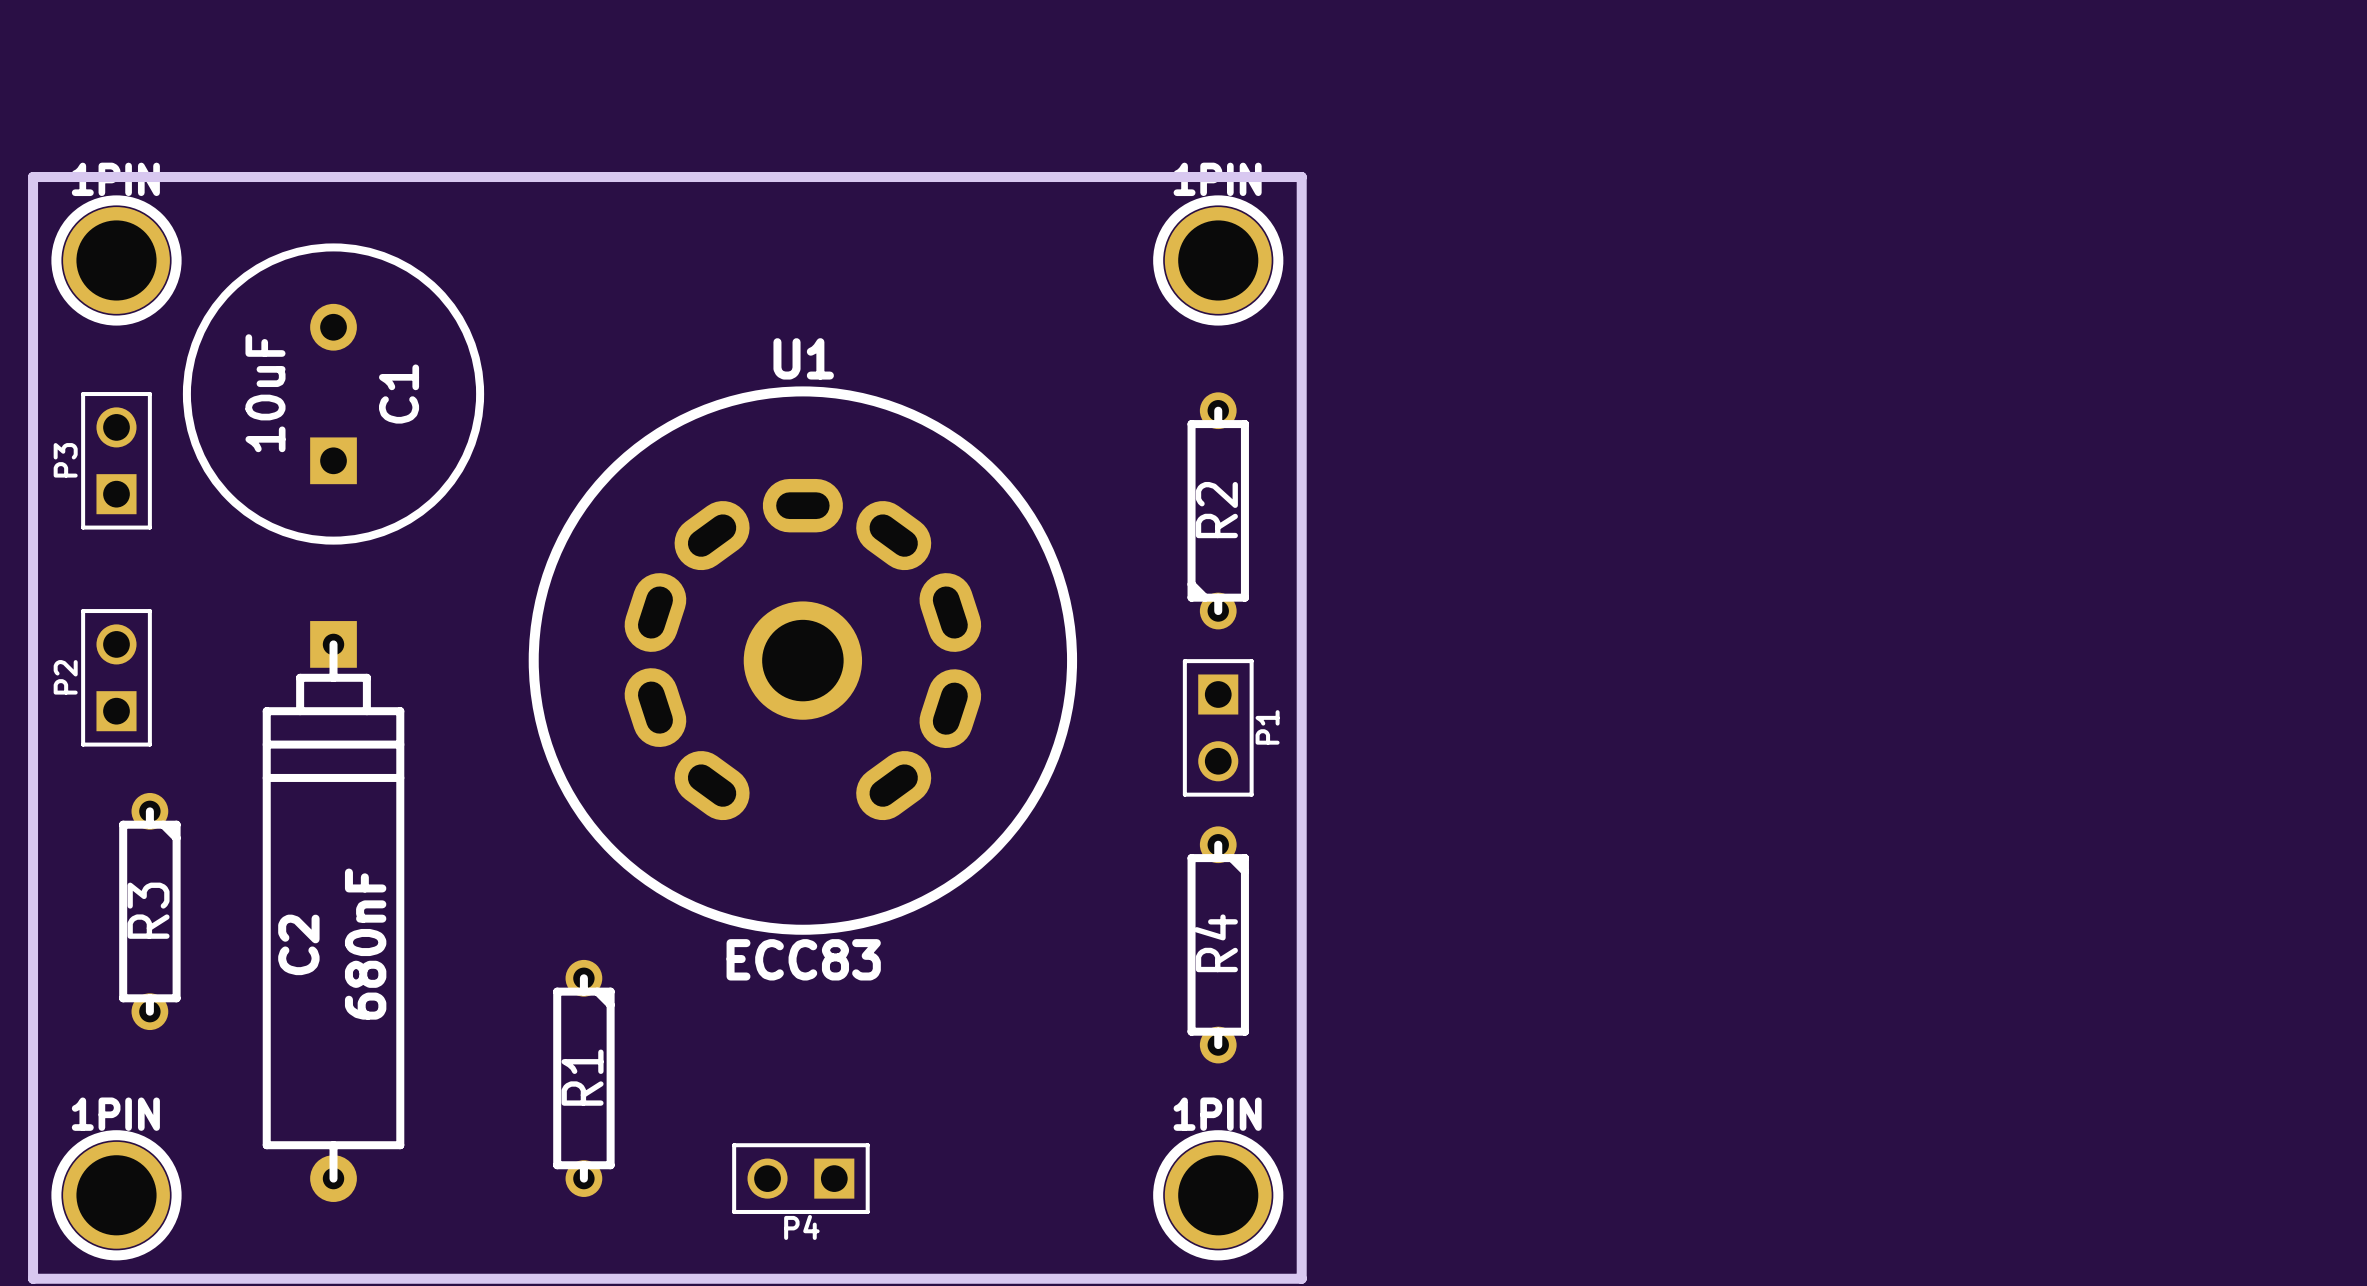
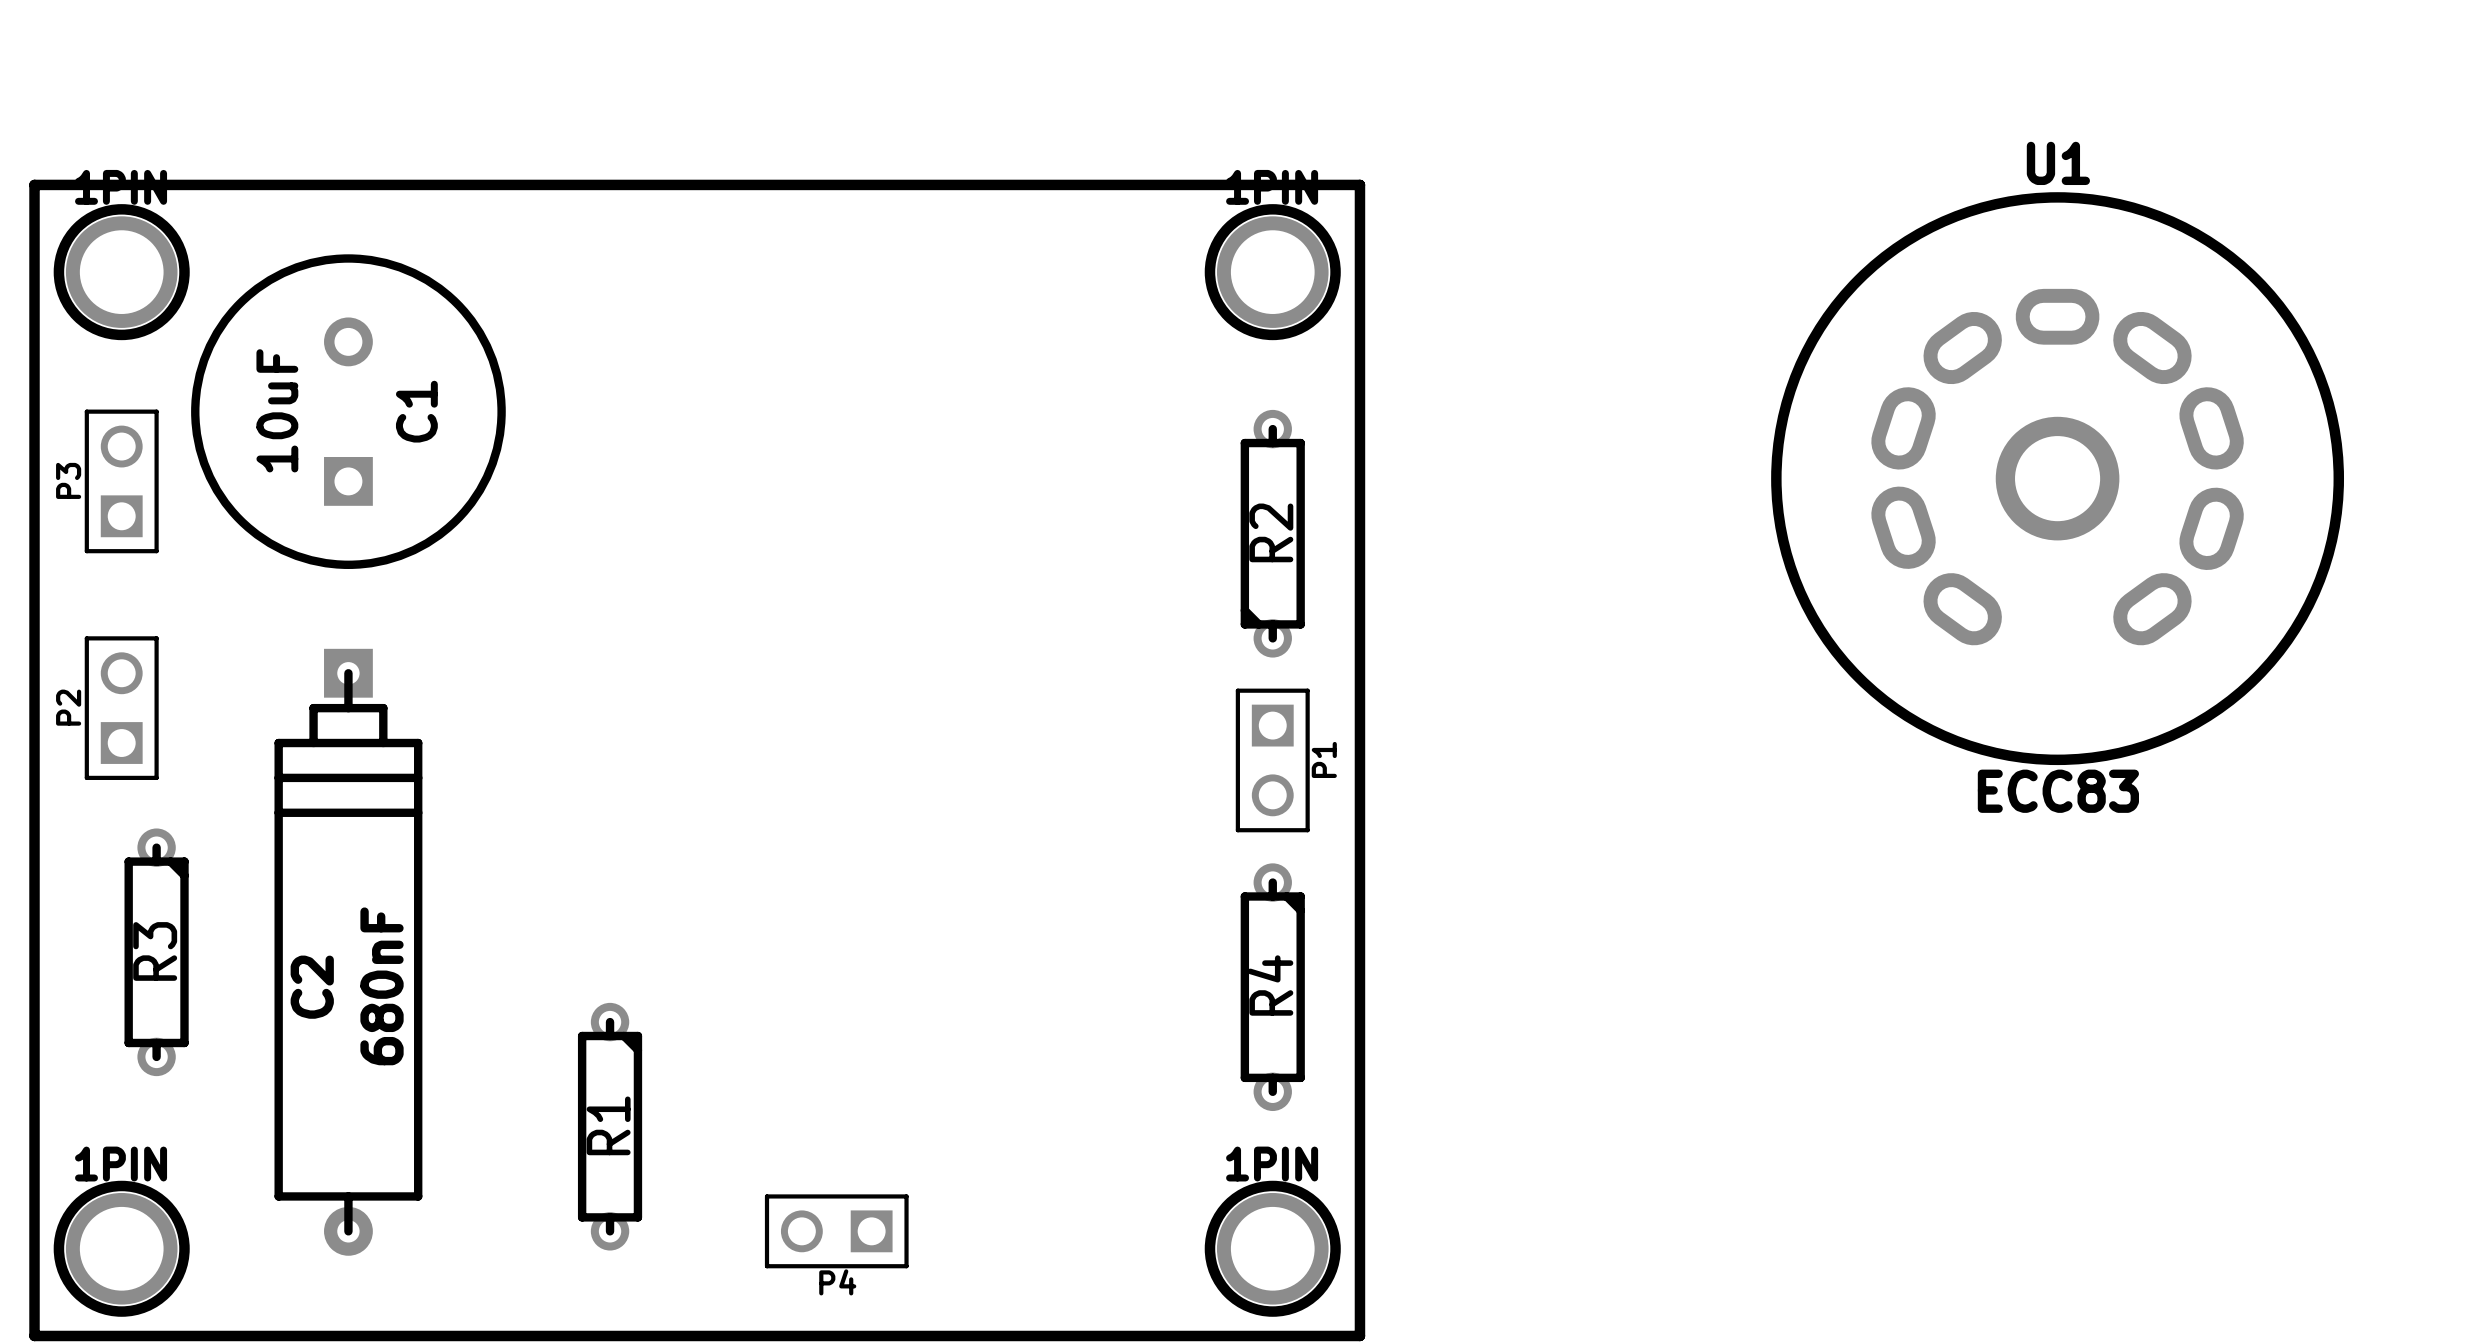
U1 position: (802, 660) -> (2057, 478)

